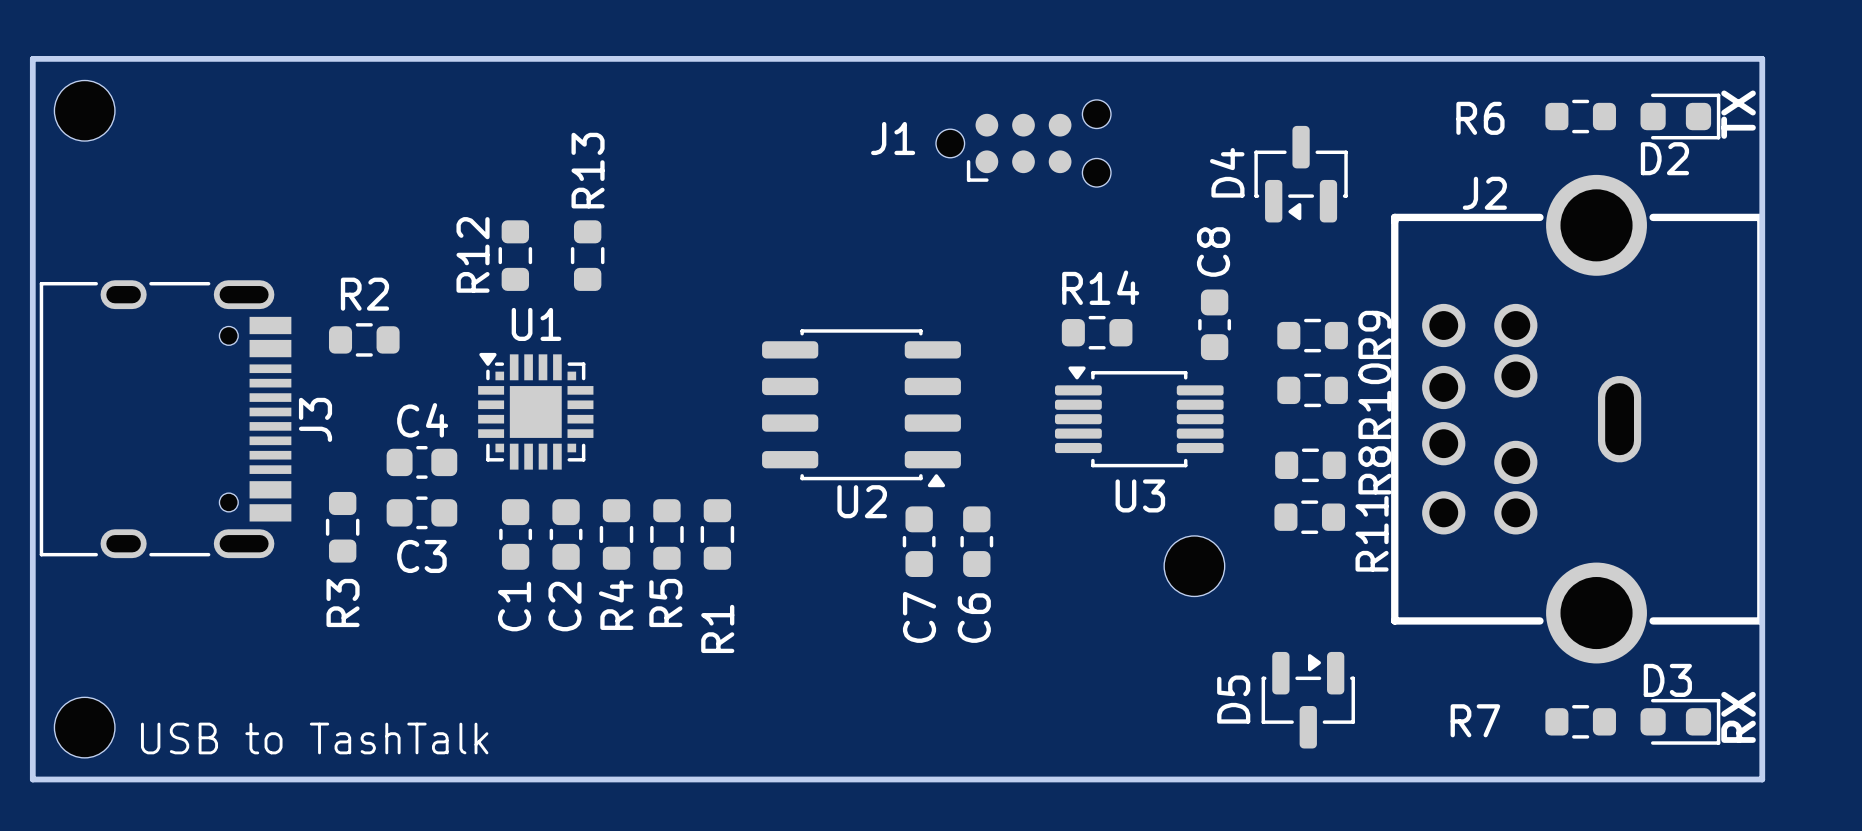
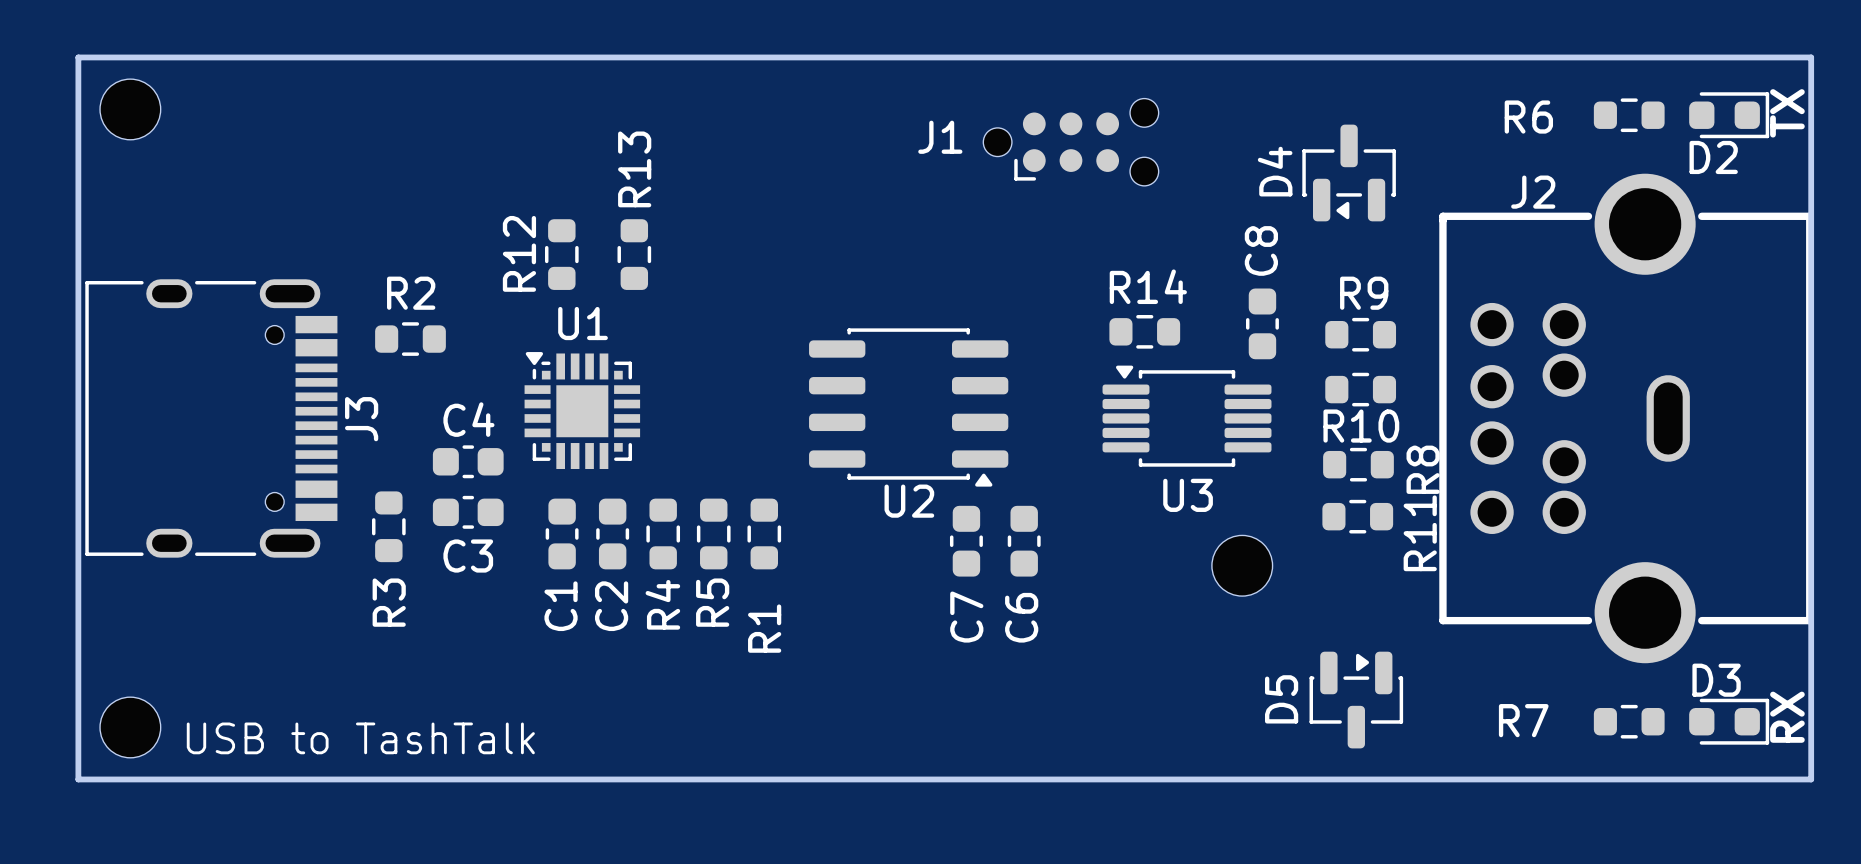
R9 name rotation: 0° (1374, 334) -> 90° clockwise (1364, 293)
R9 name position: R9 (1374, 334) -> R9 (1364, 293)
R10 name rotation: 0° (1374, 401) -> 90° clockwise (1361, 426)

